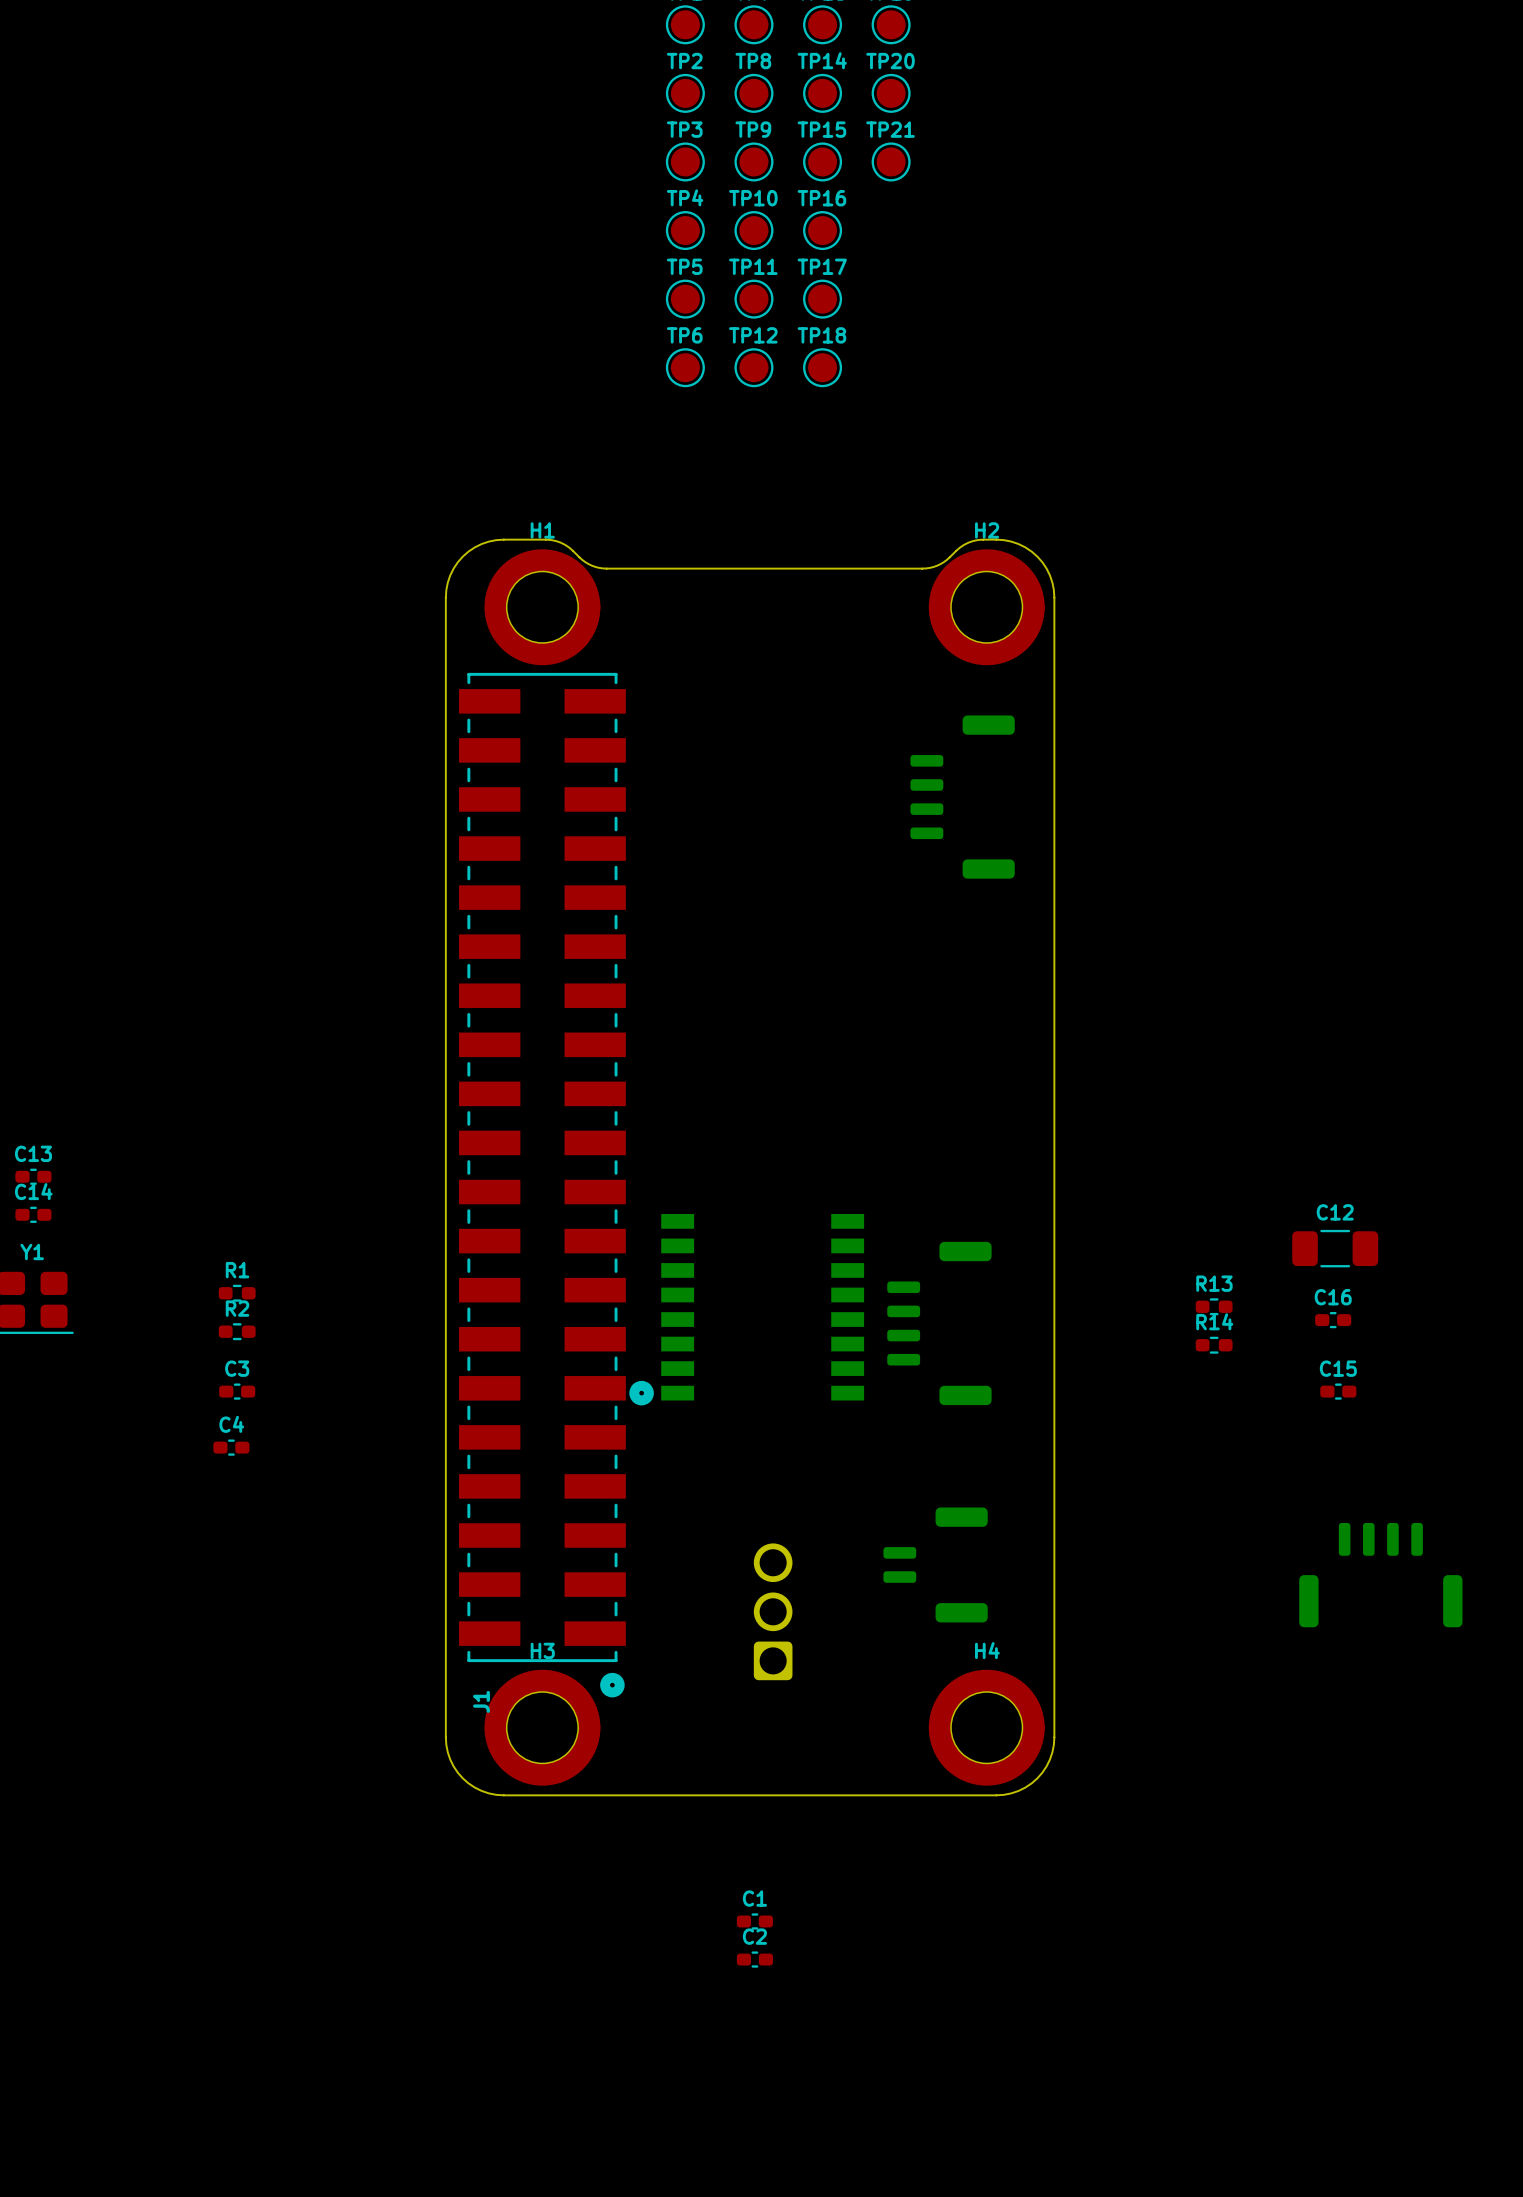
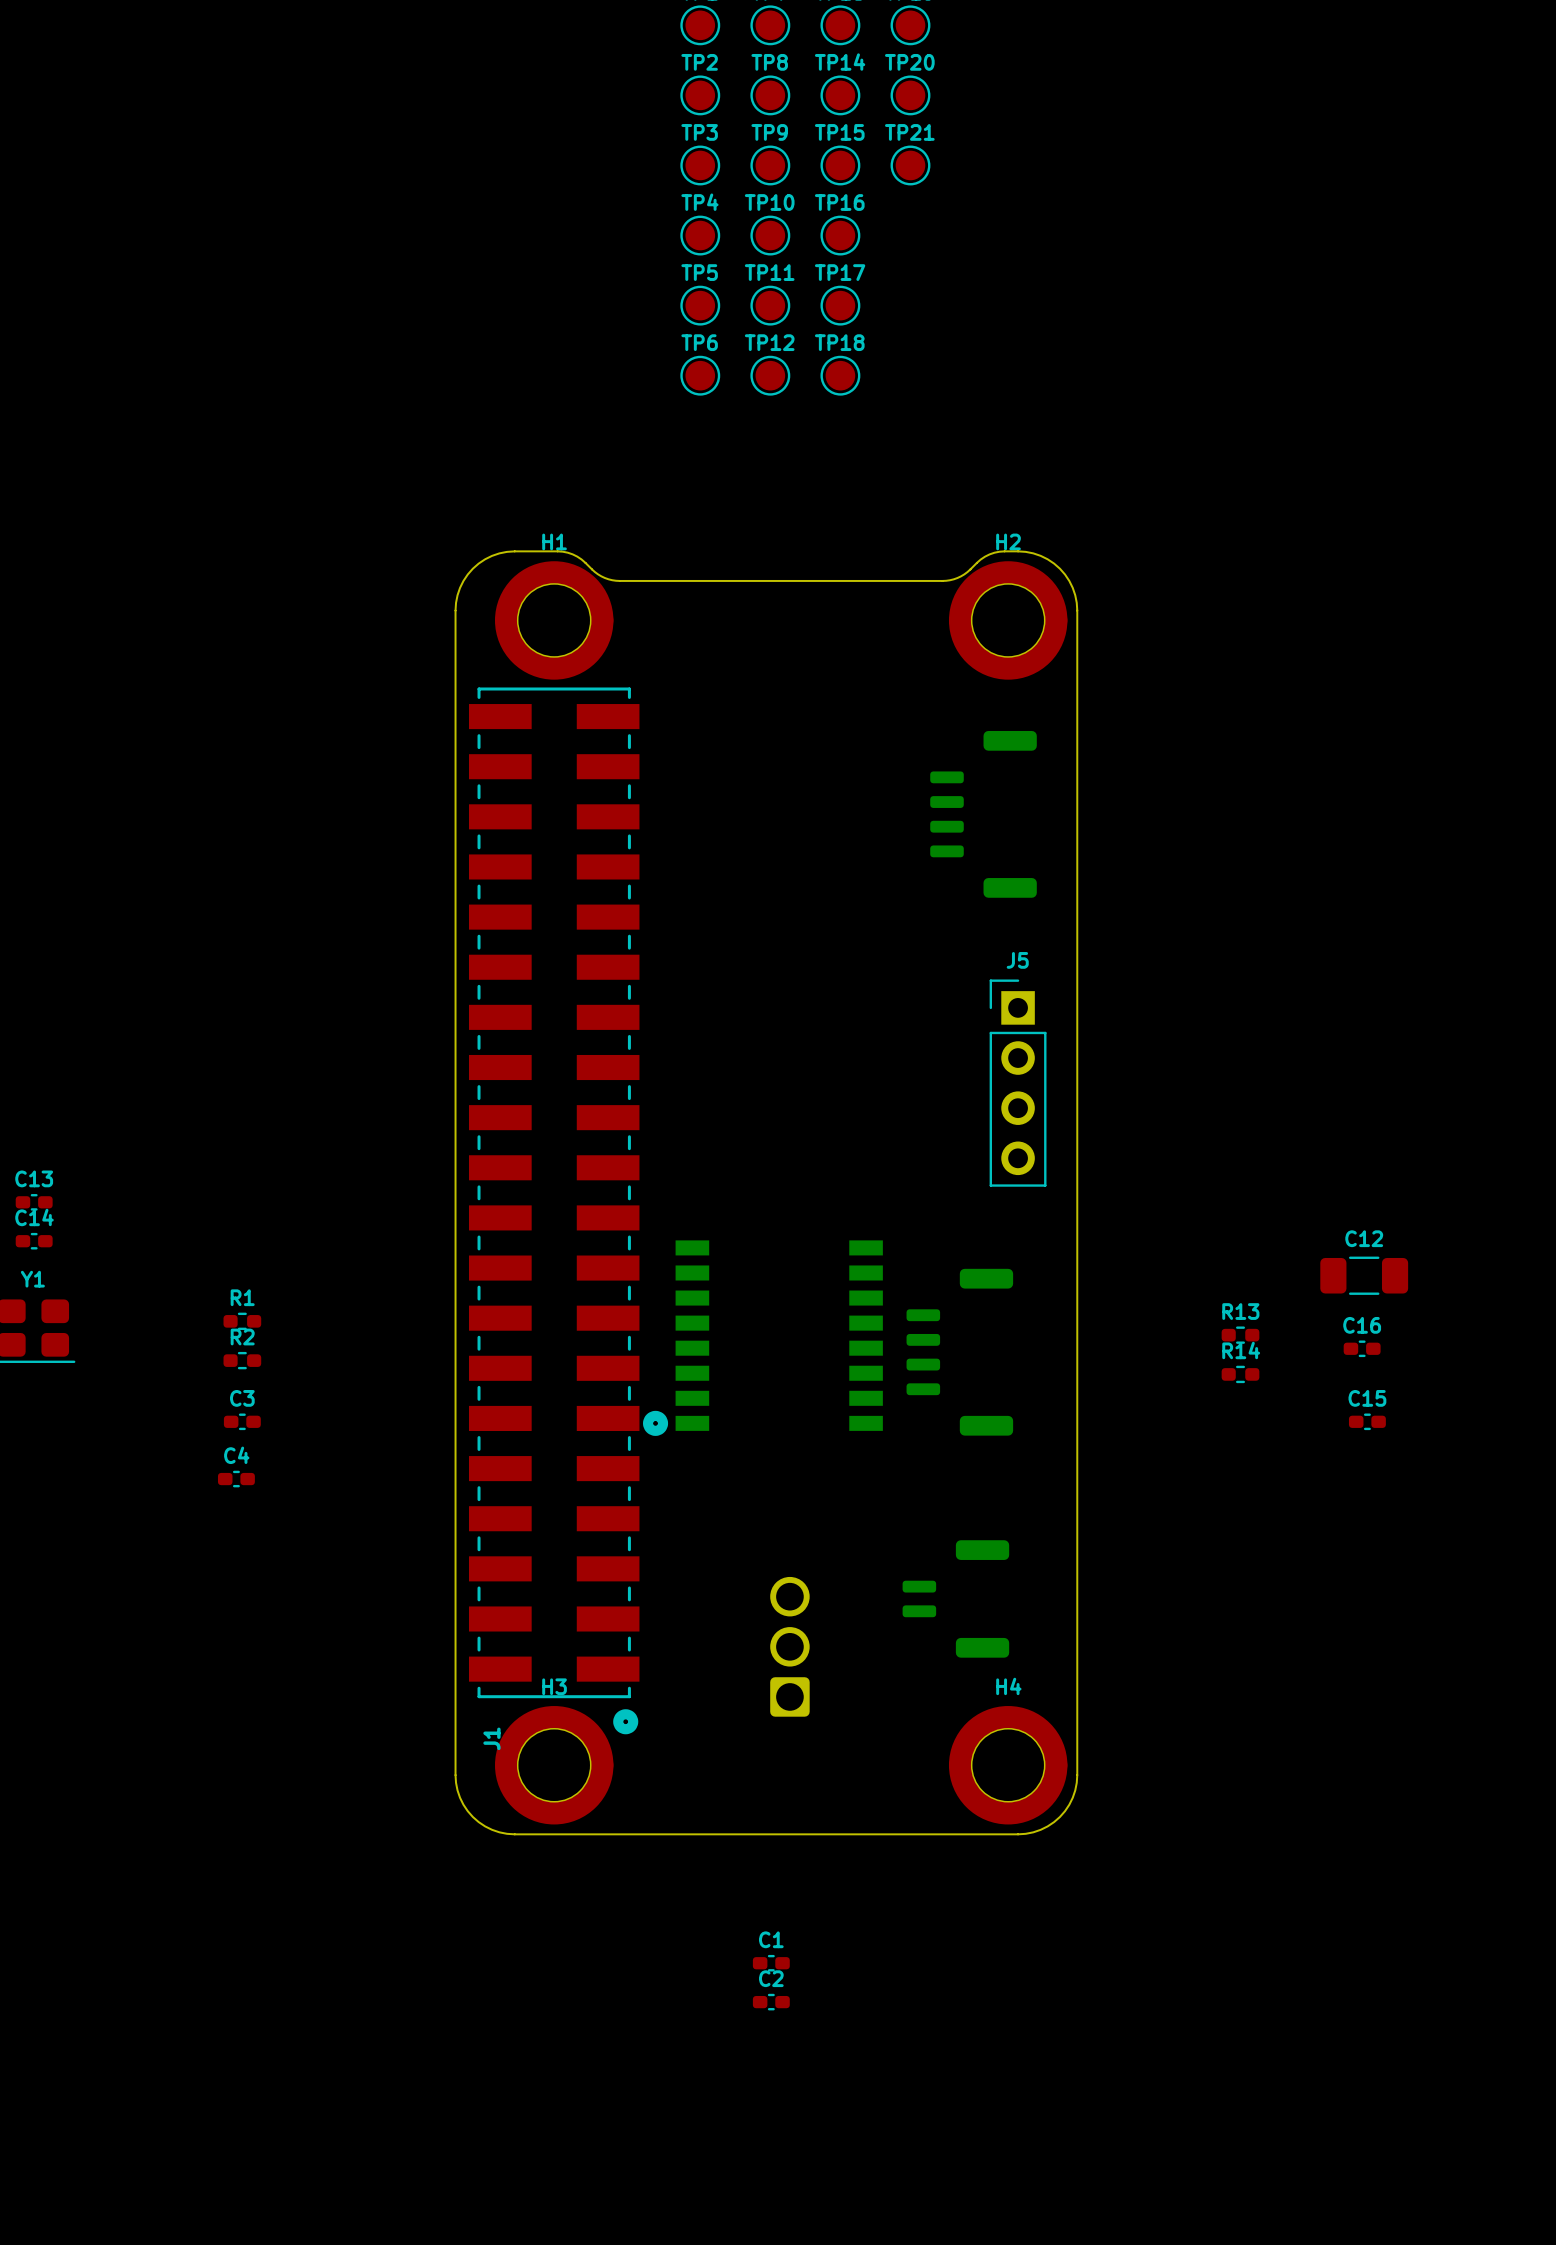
J5: none -> (1018, 1083)
part: (1380, 1575) -> none

